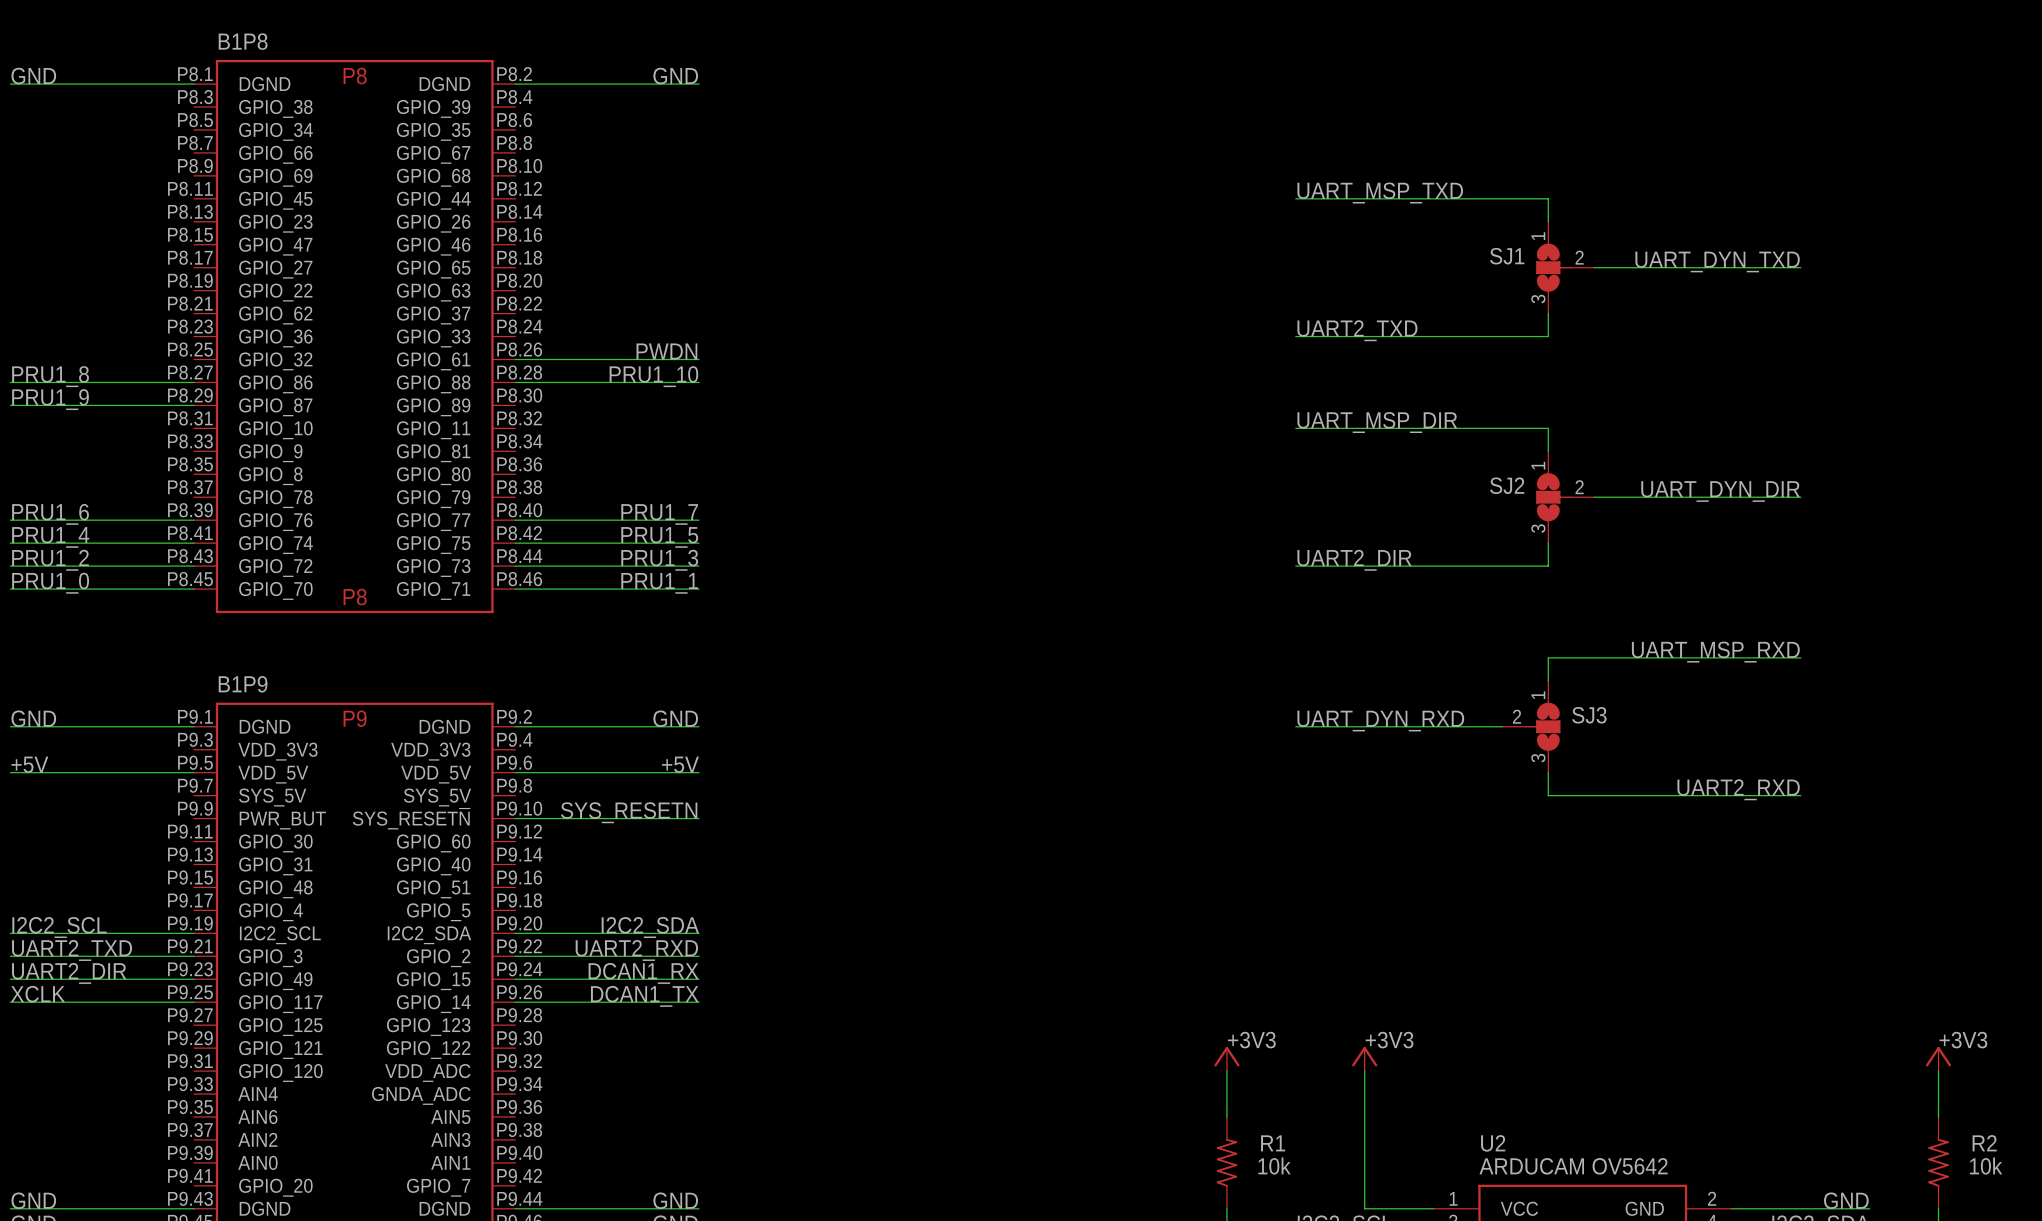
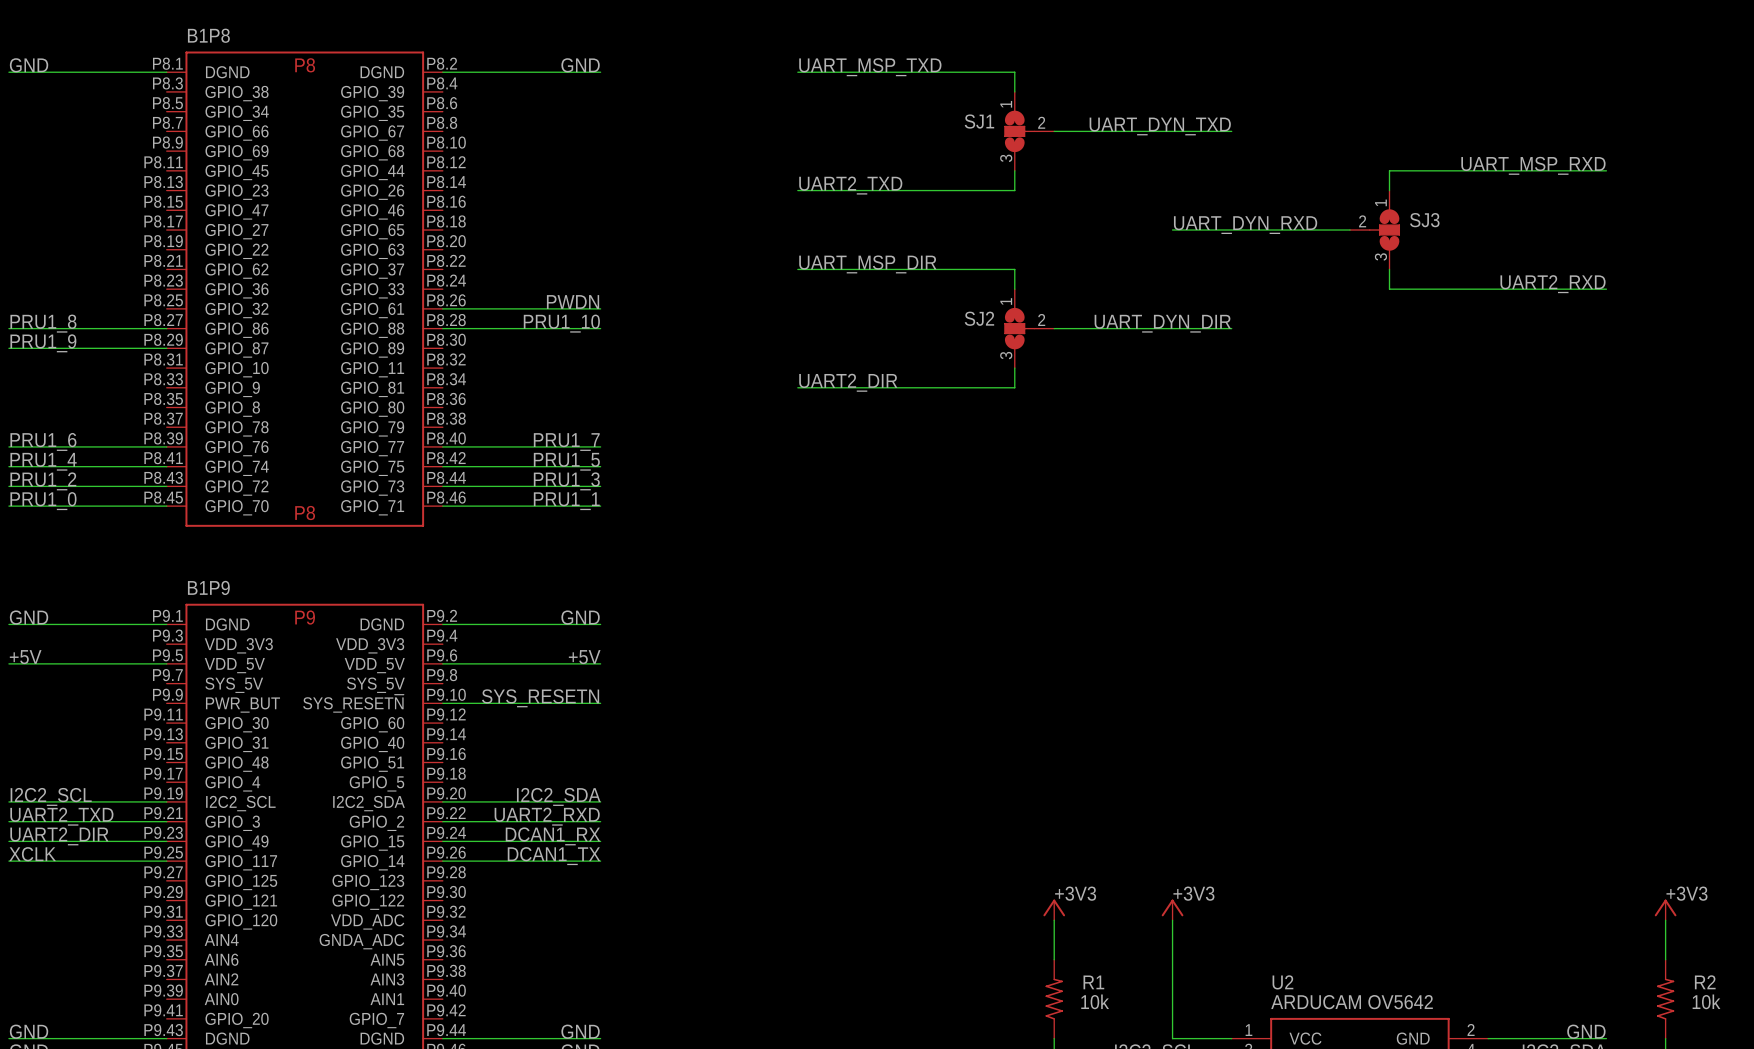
label: none -> UART_MSP_TXD (870, 67)
wire: none -> (797, 72) (1014, 72) (1014, 91)
label: none -> UART_DYN_TXD (1160, 126)
wire: none -> (1054, 131) (1231, 131)
label: UART_MSP_TXD (1380, 192) -> none
label: none -> UART_MSP_RXD (1533, 165)
wire: none -> (1014, 170) (1014, 190) (797, 190)
wire: (1295, 198) (1548, 198) (1548, 221) -> none
wire: none -> (1606, 170) (1389, 170) (1389, 190)
label: none -> UART2_TXD (850, 185)
label: none -> UART_DYN_RXD (1245, 225)
label: UART_DYN_TXD (1717, 261) -> none
wire: none -> (1172, 230) (1350, 230)
SJ1 position: (1565, 267) -> (1029, 131)
wire: (1594, 267) (1800, 267) -> none
label: none -> UART_MSP_DIR (867, 264)
wire: none -> (797, 269) (1014, 269) (1014, 289)
wire: (1548, 313) (1548, 336) (1295, 336) -> none
wire: none -> (1389, 269) (1389, 289) (1606, 289)
label: UART2_TXD (1357, 330) -> none
label: none -> UART2_RXD (1553, 284)
label: none -> UART_DYN_DIR (1162, 323)
wire: none -> (1054, 328) (1231, 328)
label: UART_MSP_DIR (1377, 422) -> none
wire: none -> (1014, 368) (1014, 387) (797, 387)
wire: (1295, 428) (1548, 428) (1548, 451) -> none
label: none -> UART2_DIR (848, 382)
label: UART_DYN_DIR (1720, 491) -> none
SJ2 position: (1565, 497) -> (1029, 328)
wire: (1594, 497) (1800, 497) -> none
wire: (1548, 543) (1548, 566) (1295, 566) -> none
label: UART2_DIR (1354, 560) -> none
label: UART_MSP_RXD (1715, 652) -> none
wire: (1800, 657) (1548, 657) (1548, 680) -> none
label: UART_DYN_RXD (1380, 721) -> none
wire: (1295, 726) (1502, 726) -> none
SJ3 position: (1531, 726) -> (1375, 230)
wire: (1548, 772) (1548, 795) (1800, 795) -> none
label: UART2_RXD (1738, 789) -> none

